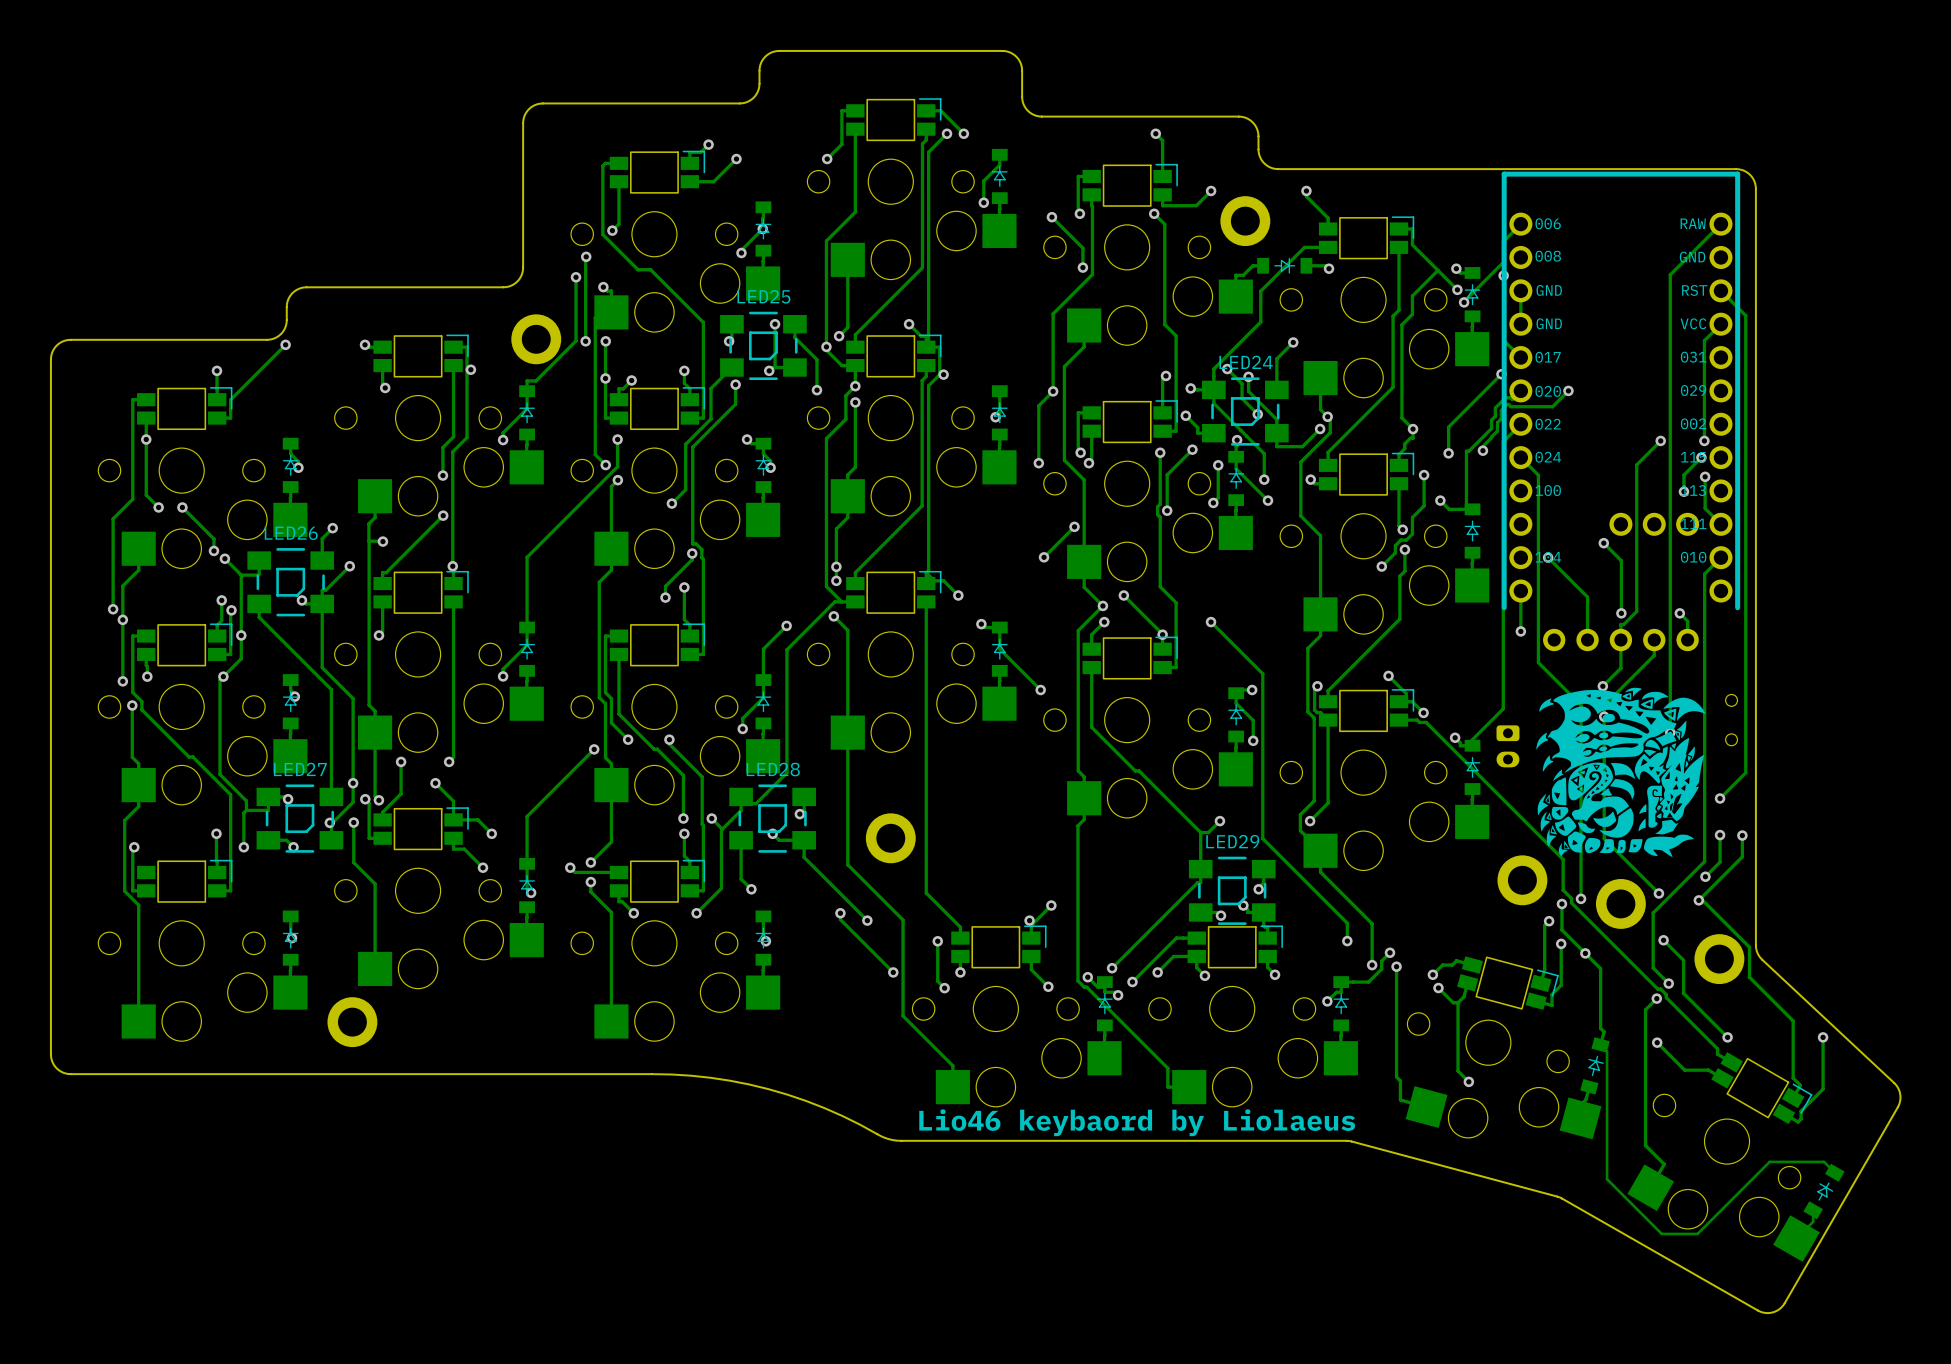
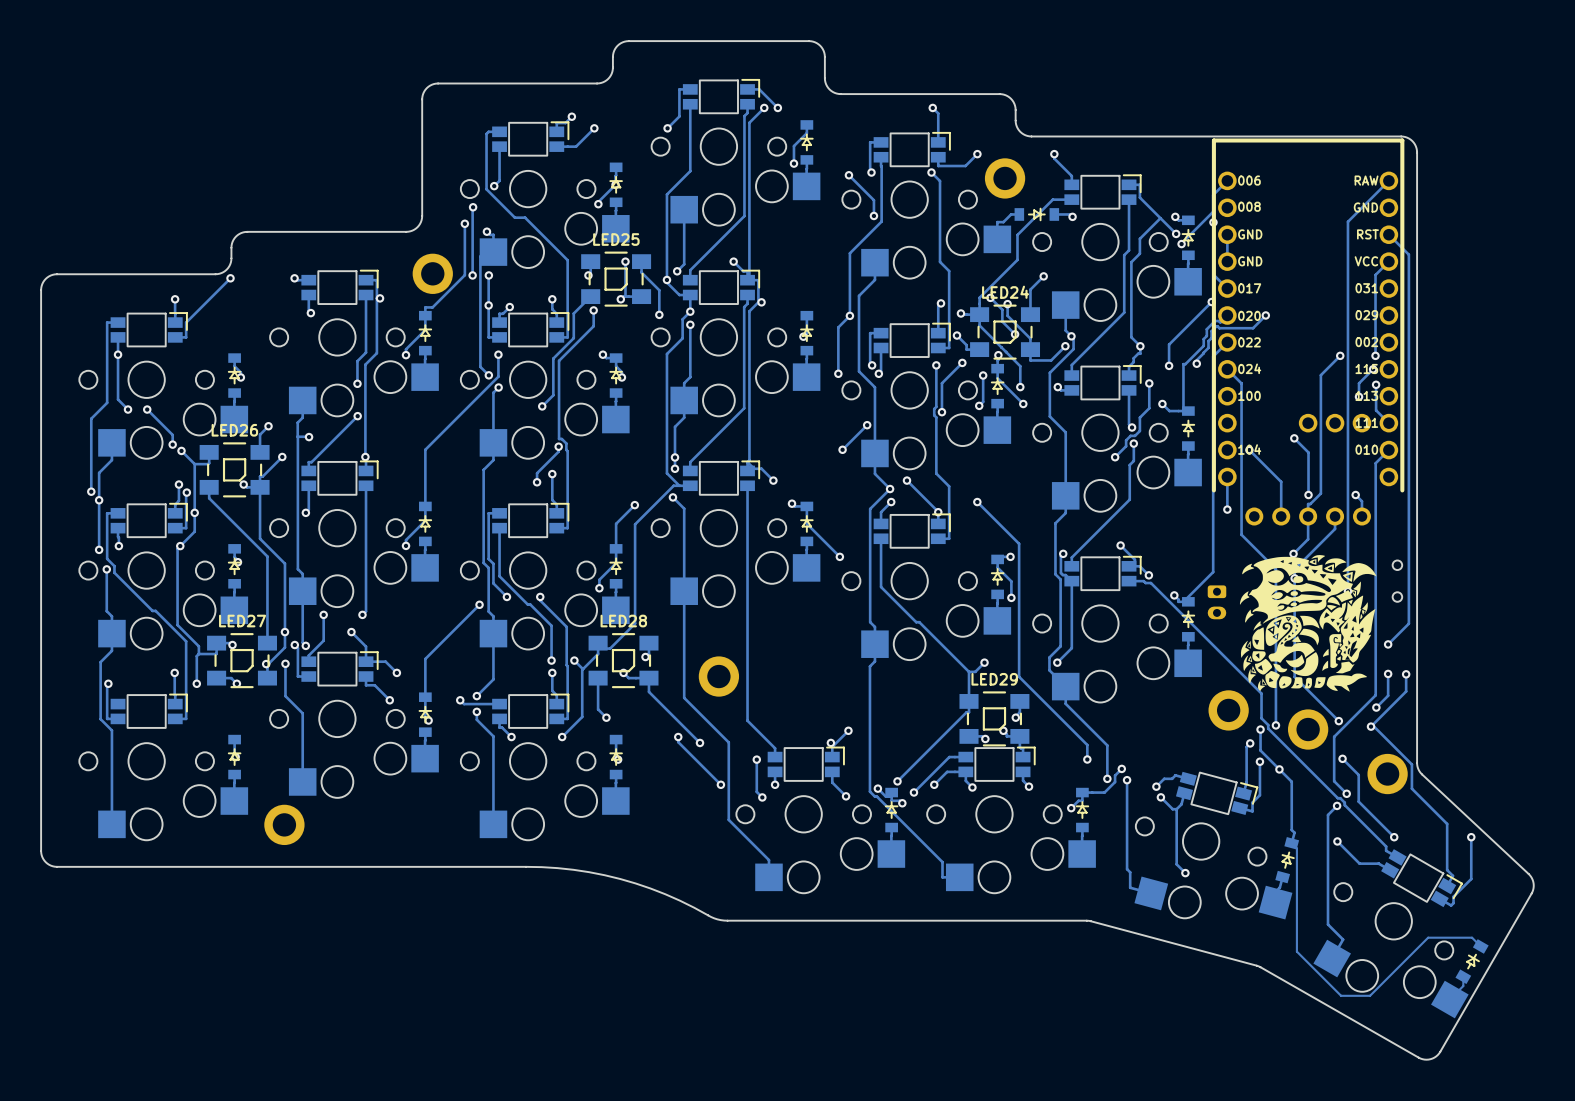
text: Lio46 keybaord by Liolaeus (1137, 1122) -> none

